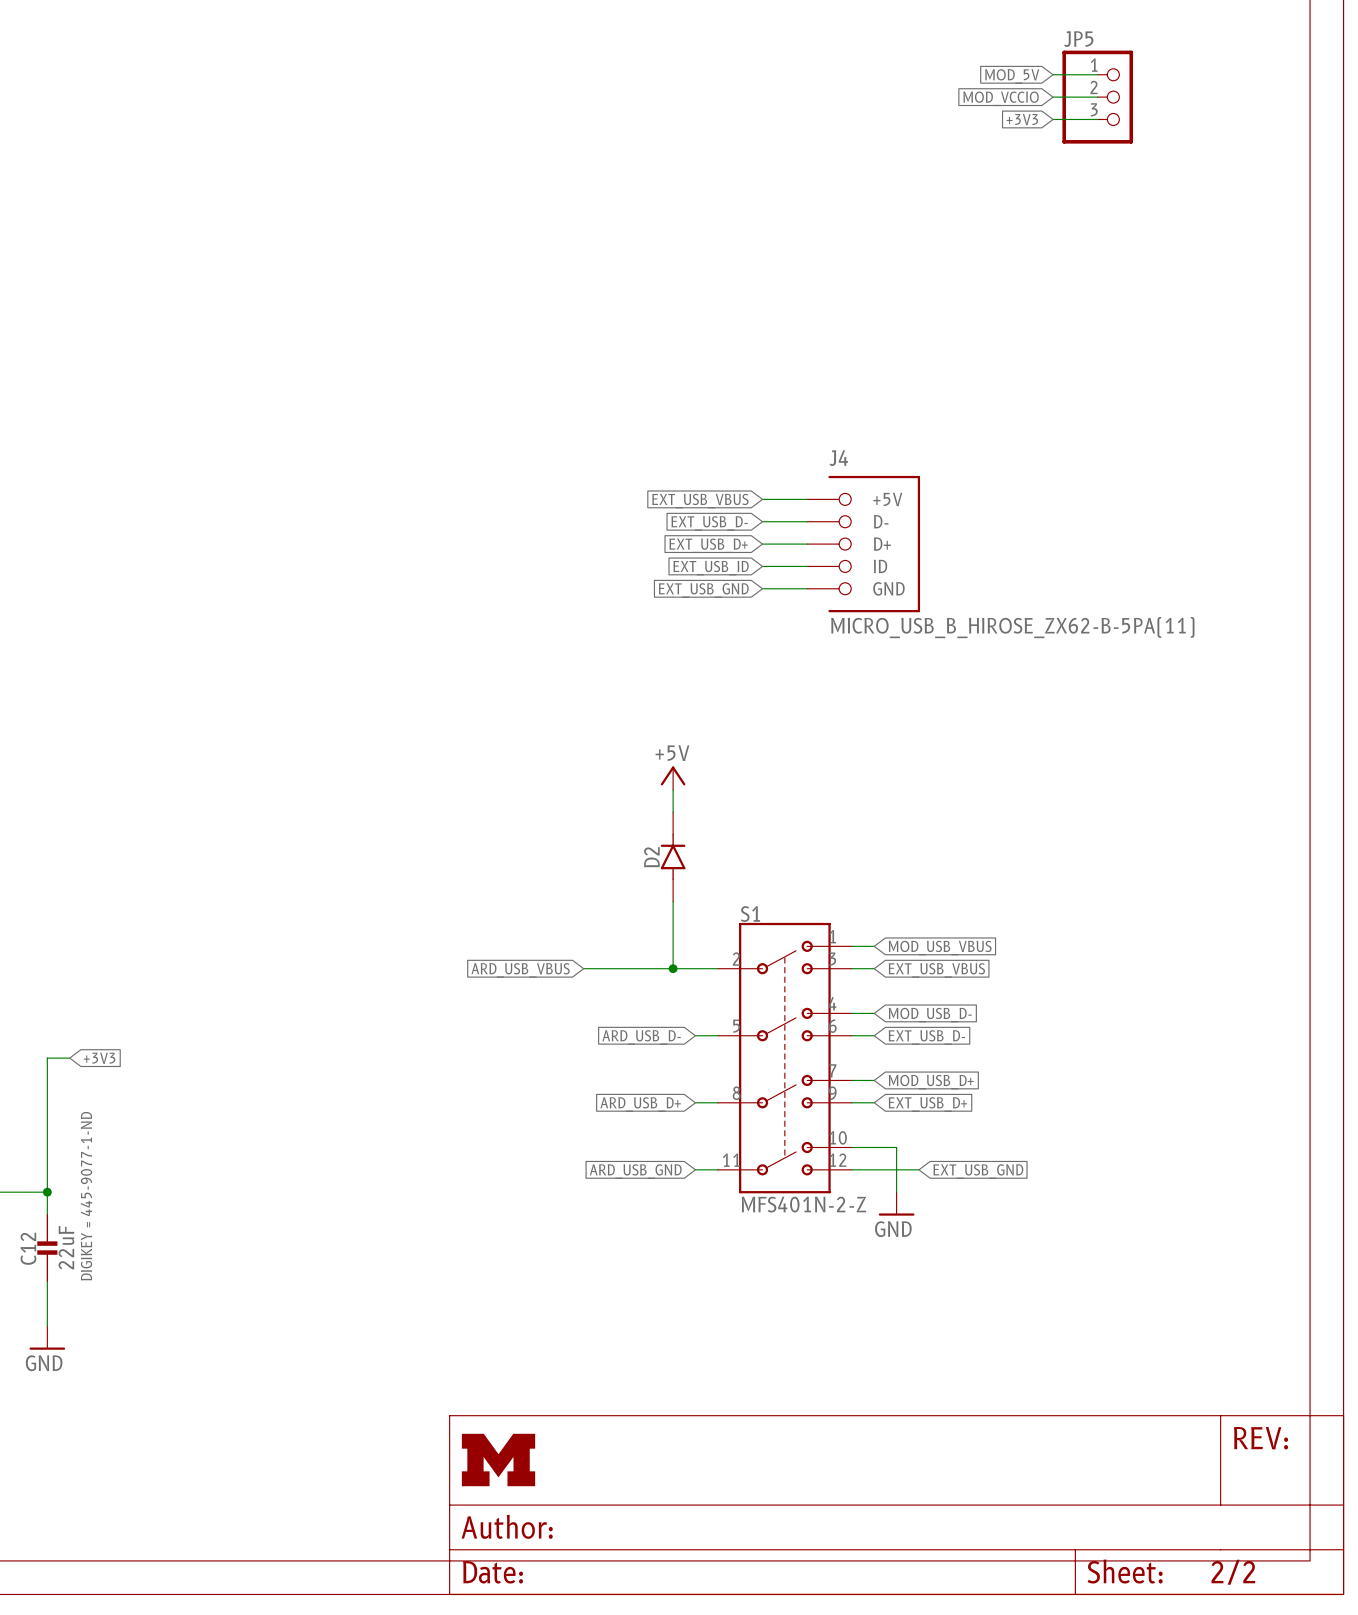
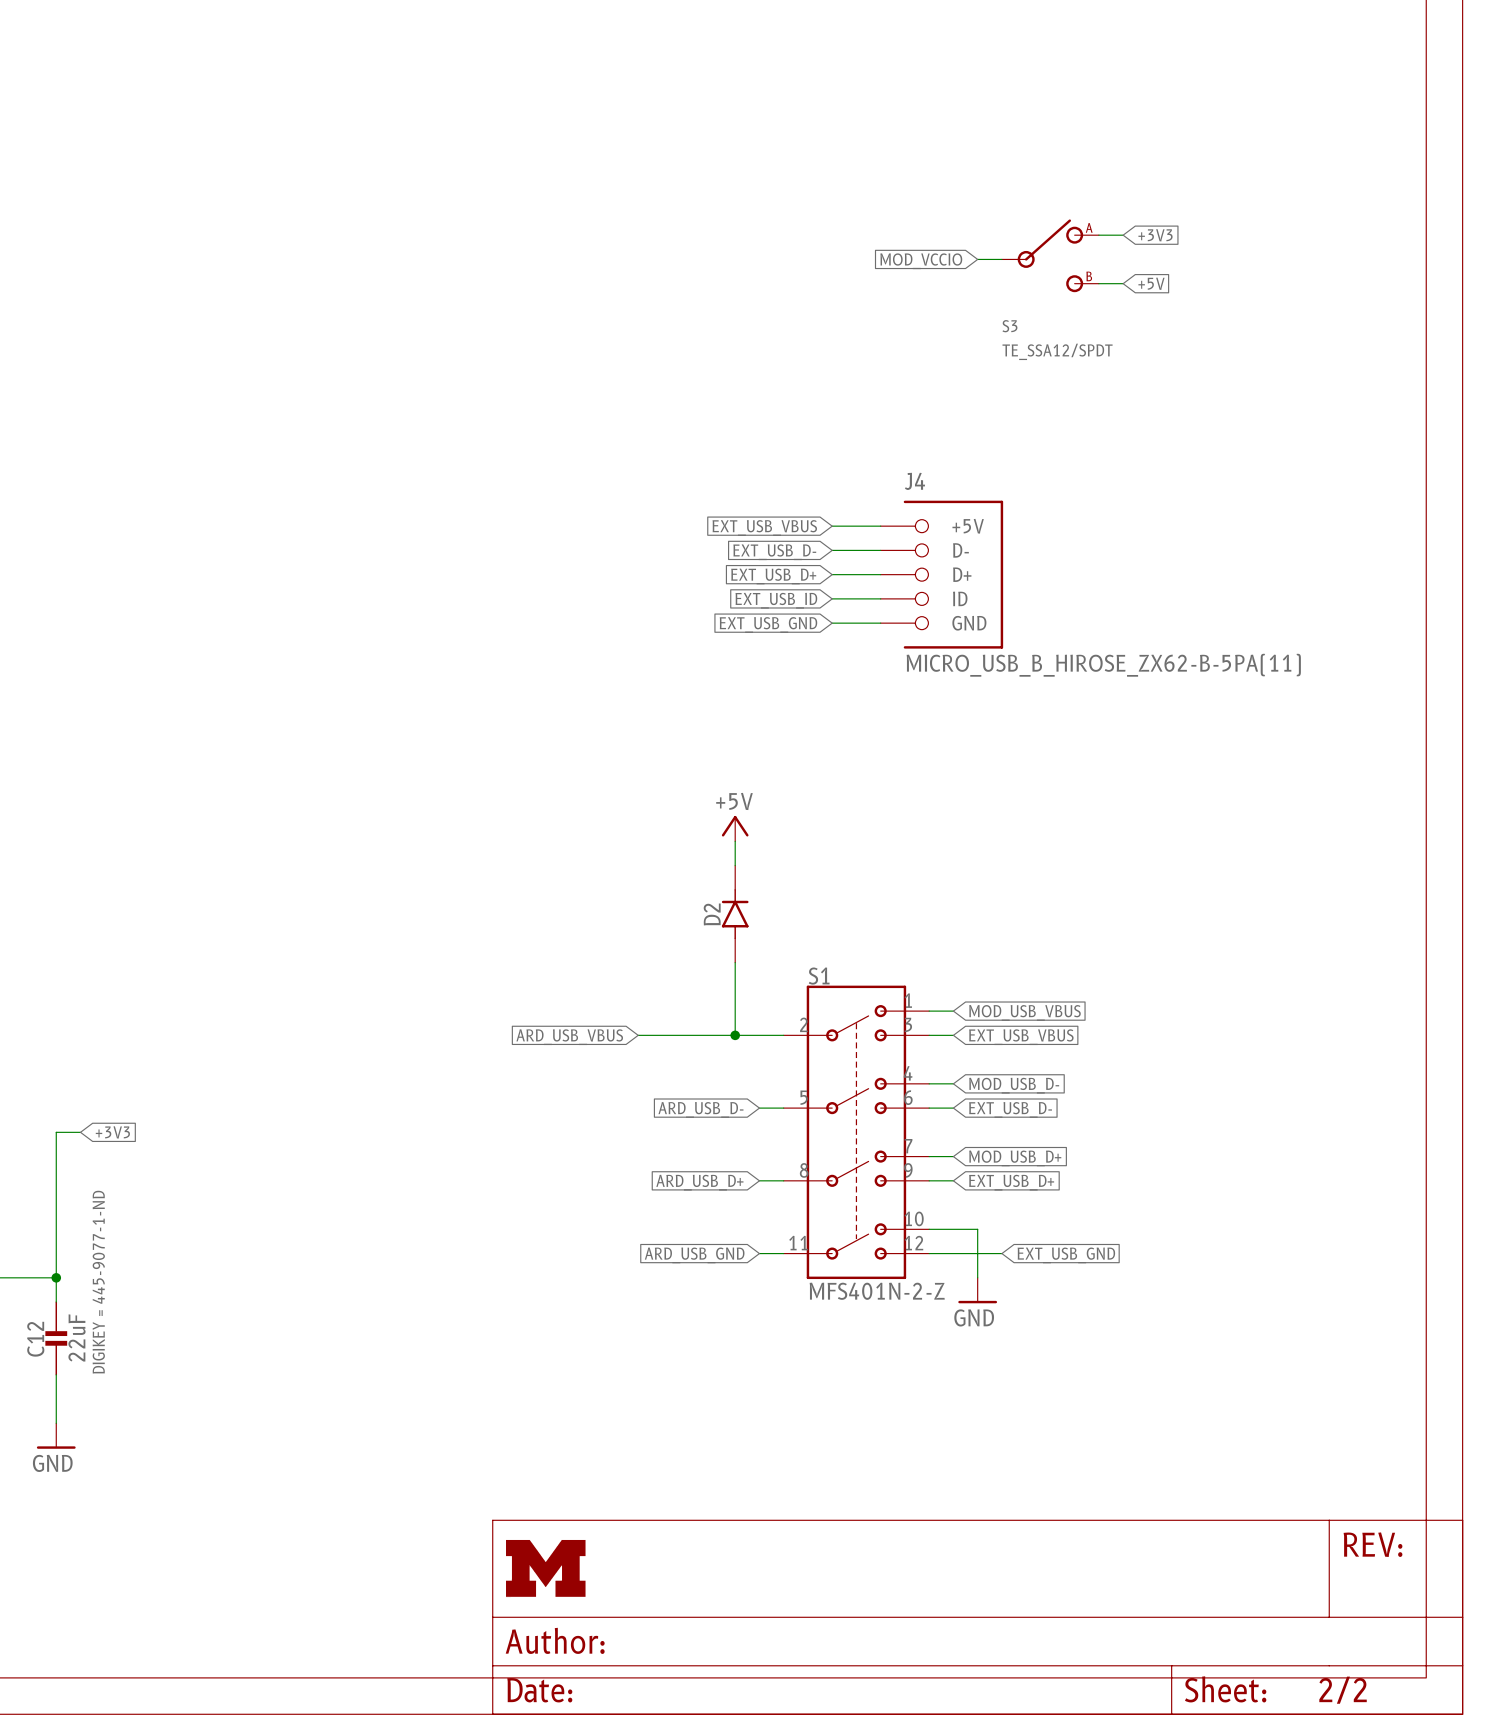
wire: (1053, 74) (1097, 74) -> none
global label: MOD_5V (1012, 76) -> none
wire: (1053, 97) (1097, 97) -> none
JP5: (1097, 97) -> none
global label: MOD_VCCIO (1001, 98) -> none
global label rotation: 0° (1022, 119) -> 180° (1155, 235)
global label position: +3V3 (1022, 119) -> +3V3 (1155, 235)
wire: (1053, 119) (1097, 119) -> none
wire: none -> (1098, 235) (1123, 235)
S3: none -> TE_SSA12/SPDT (1050, 255)
wire: none -> (977, 259) (1001, 259)
global label: none -> MOD_VCCIO (921, 261)
wire: none -> (1098, 283) (1123, 283)
global label: none -> +5V (1151, 283)

